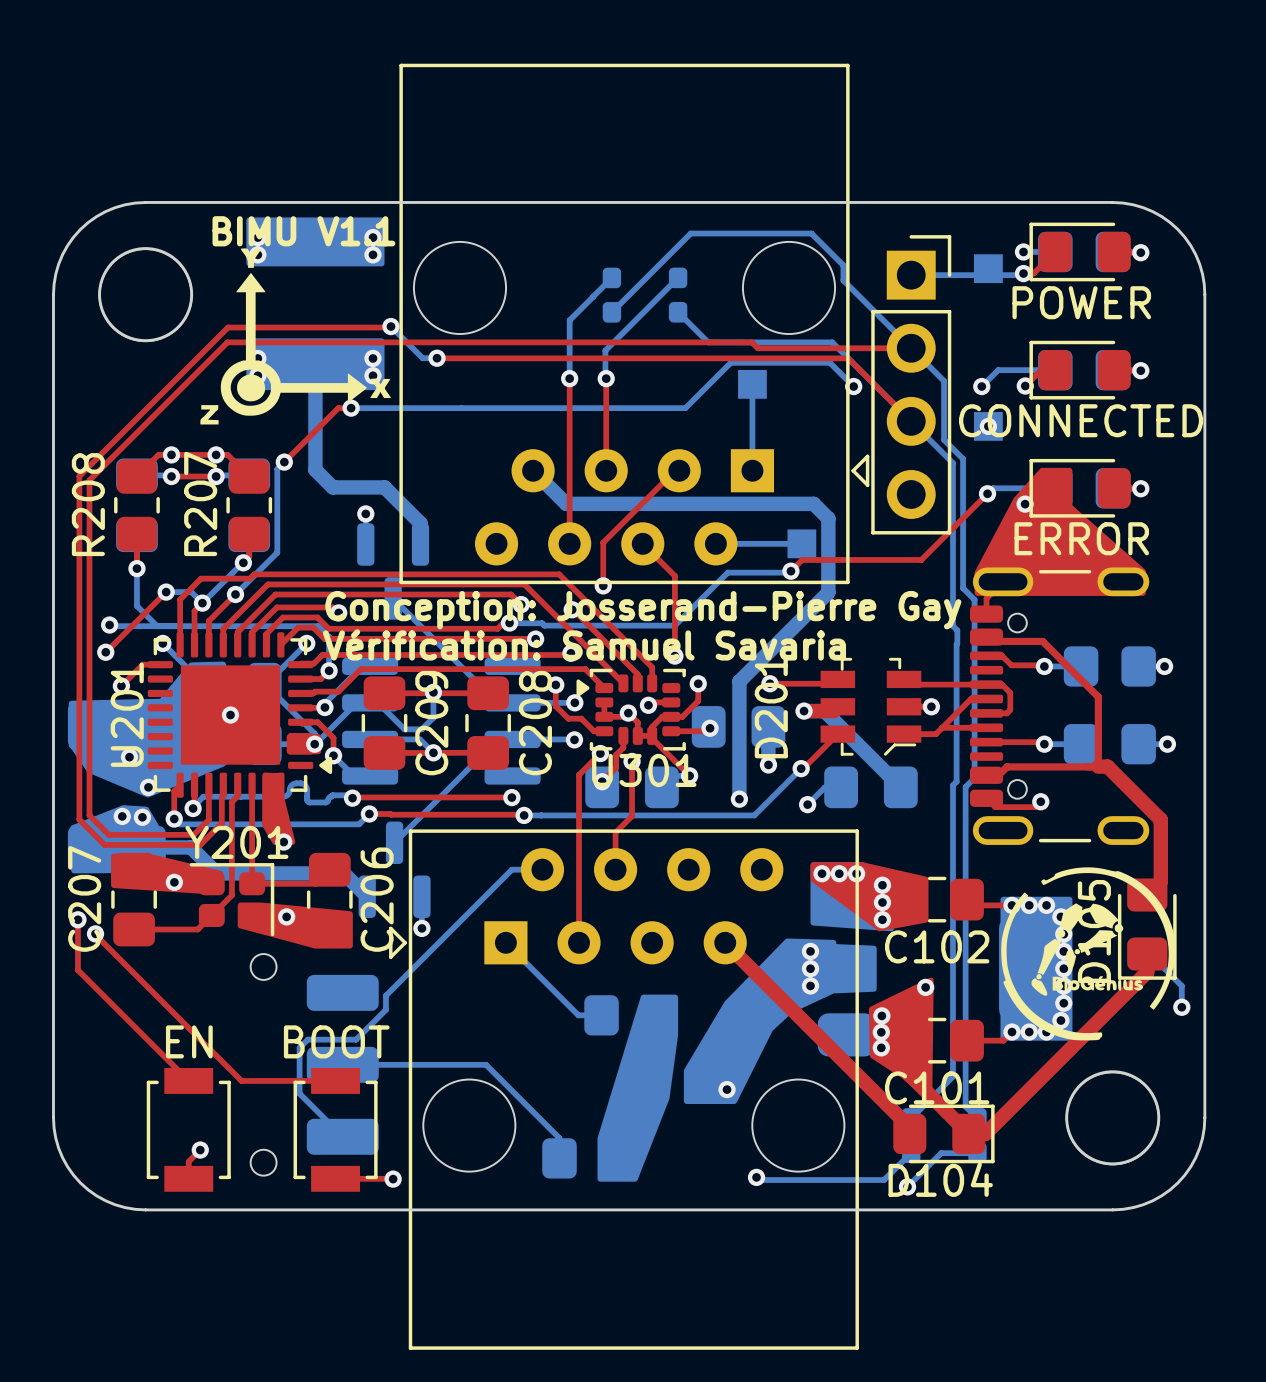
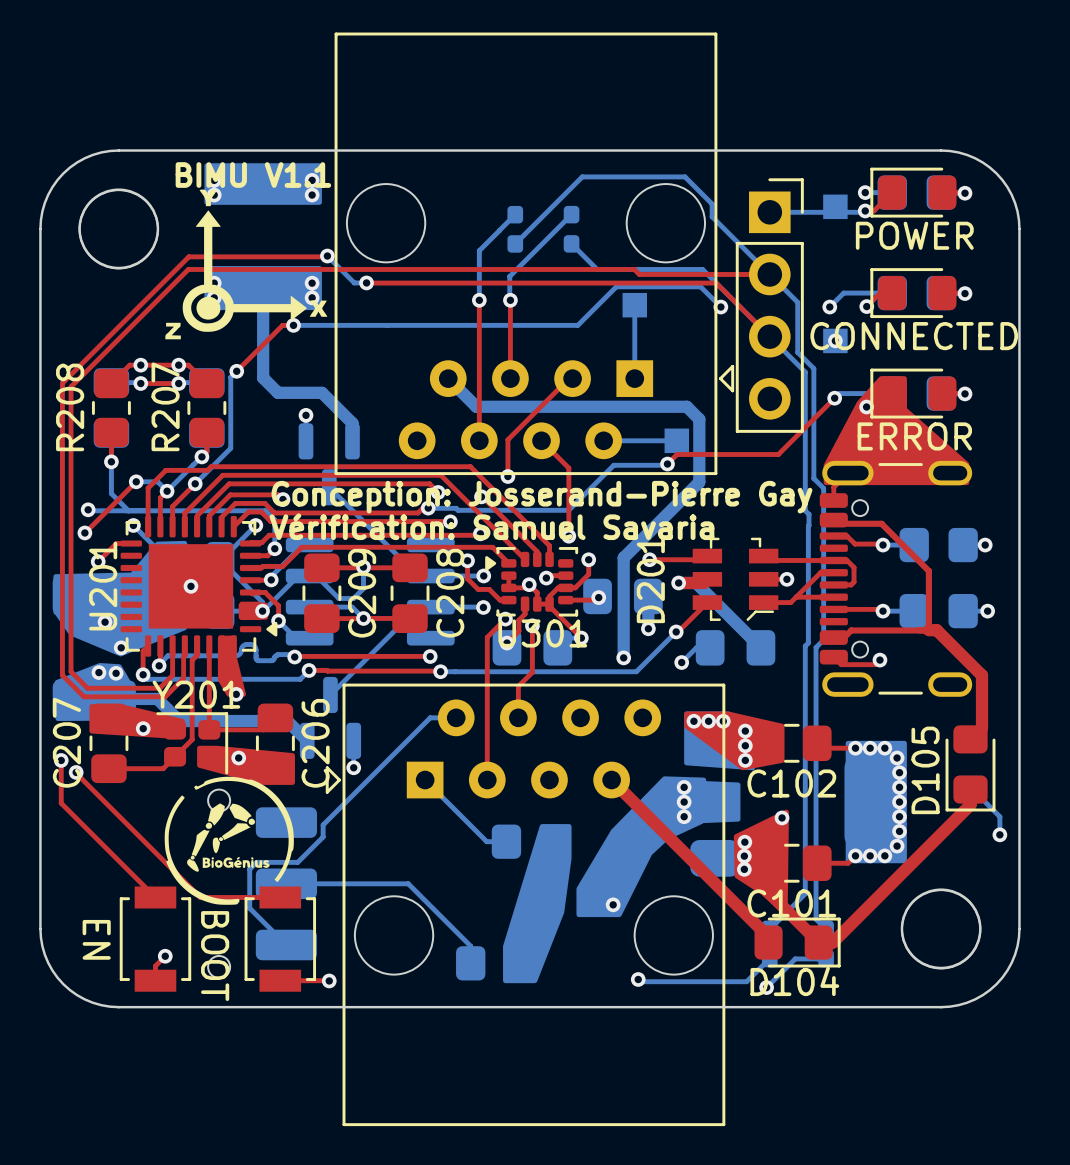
drawing: [1001, 867, 1176, 1041] -> none
drawing: none -> [164, 776, 294, 905]
text rotation: 0° (189, 1041) -> 90° clockwise (96, 939)
text position: EN (189, 1041) -> EN (96, 939)
text rotation: 0° (336, 1041) -> 90° clockwise (215, 956)

